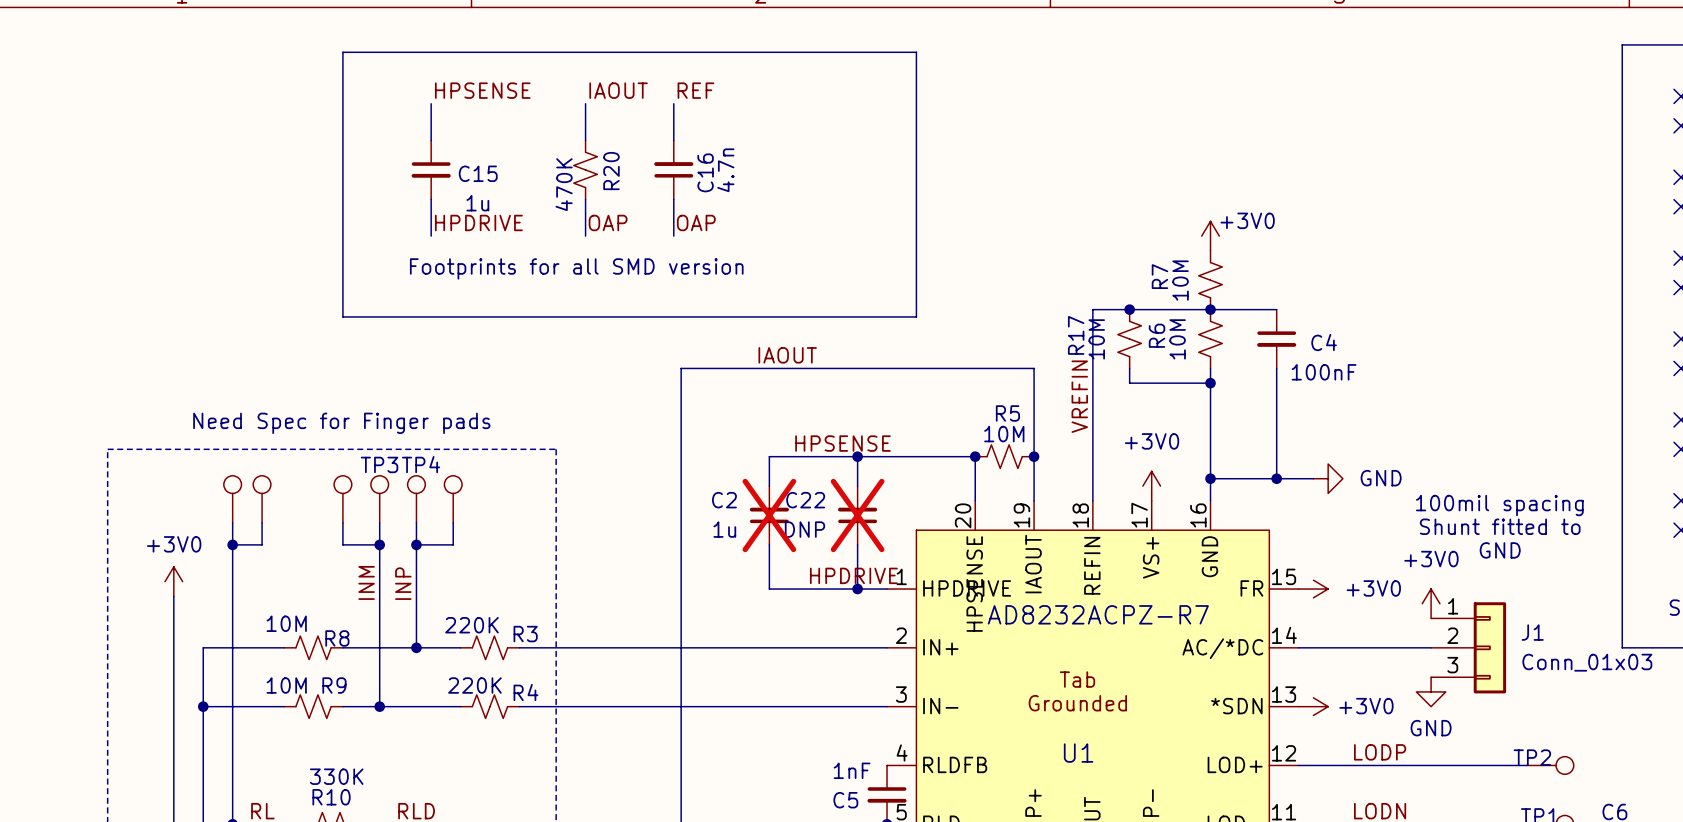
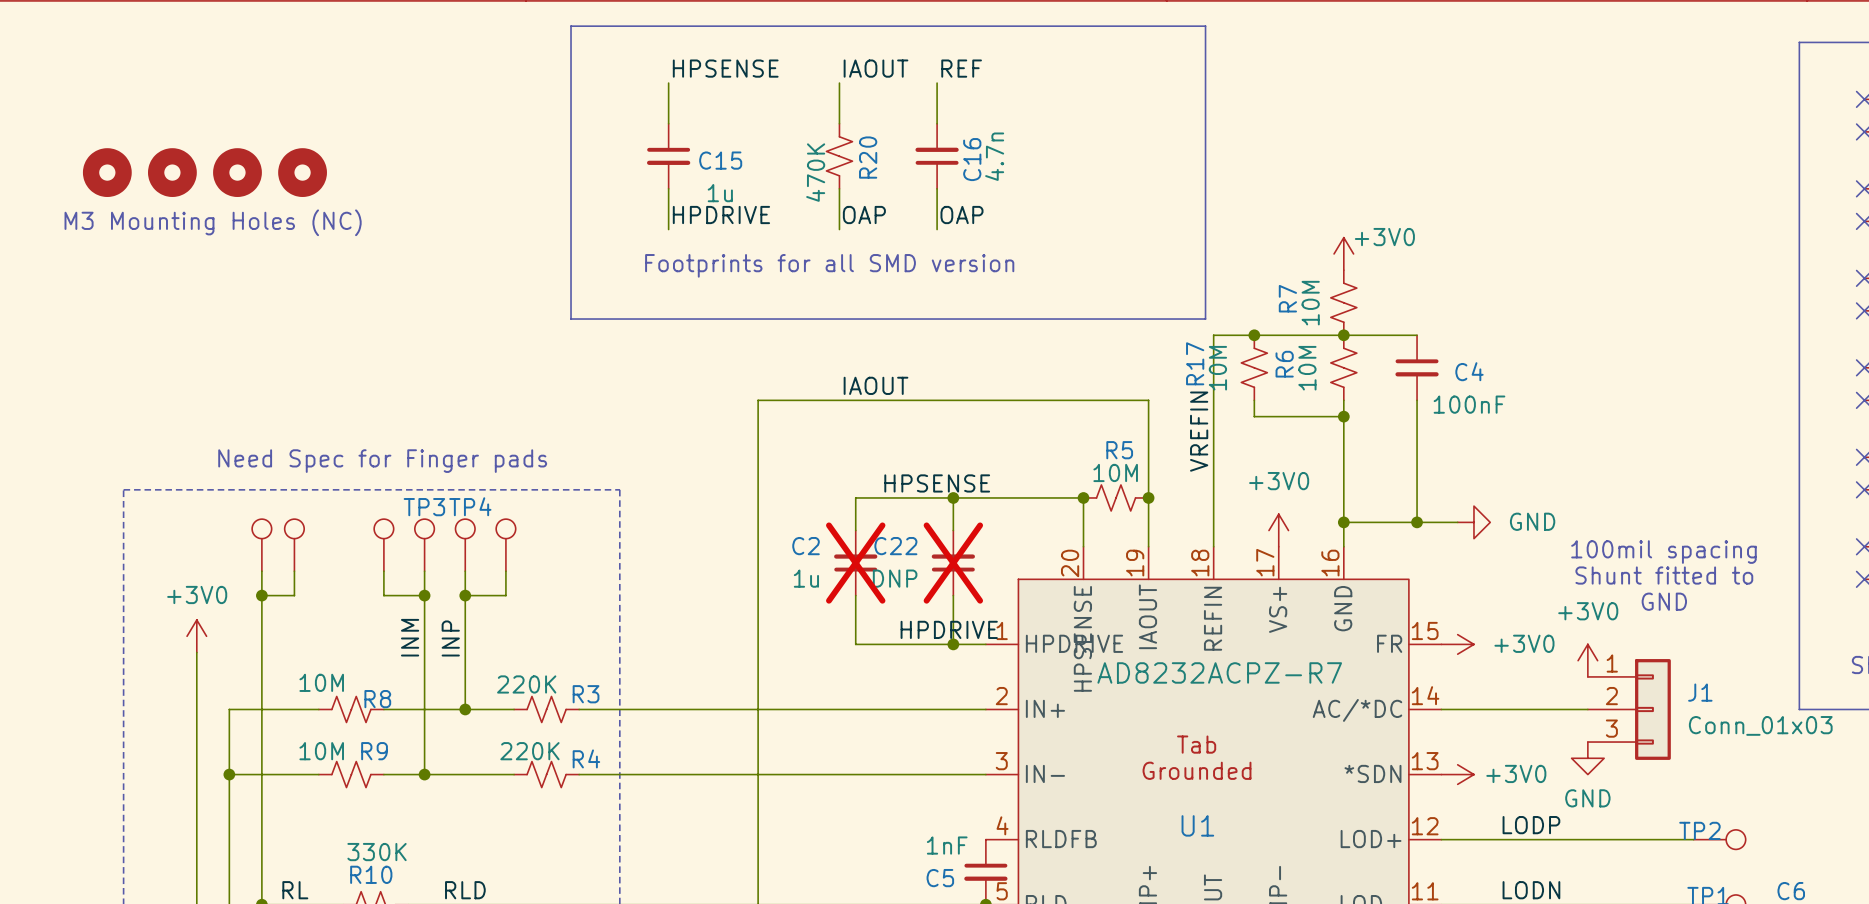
line: (342, 52) (916, 52) (916, 316) (342, 316) (342, 52) -> (571, 26) (1205, 26) (1205, 319) (571, 319) (571, 26)
label position: HPSENSE (482, 90) -> HPSENSE (725, 68)
label position: IAOUT (618, 90) -> IAOUT (876, 68)
label position: REF (695, 90) -> REF (961, 68)
wire: (431, 103) (431, 140) -> (668, 83) (668, 123)
wire: (585, 103) (585, 140) -> (839, 83) (839, 123)
wire: (673, 103) (673, 140) -> (937, 83) (937, 123)
part: none -> (107, 172)
part: none -> (172, 172)
part: none -> (237, 172)
part: none -> (302, 172)
C15 position: (431, 169) -> (668, 156)
R20 position: (585, 169) -> (839, 156)
C16 position: (673, 169) -> (937, 156)
wire: (431, 199) (431, 236) -> (668, 188) (668, 229)
wire: (585, 199) (585, 236) -> (839, 188) (839, 229)
wire: (673, 199) (673, 236) -> (937, 188) (937, 229)
label: none -> OAP (961, 215)
text: none -> M3 Mounting Holes (NC) (213, 222)
label position: HPDRIVE (478, 222) -> HPDRIVE (721, 215)
label: OAP (608, 222) -> none
label position: OAP (696, 222) -> OAP (864, 215)
text position: Footprints for all SMD version (576, 268) -> Footprints for all SMD version (829, 265)

